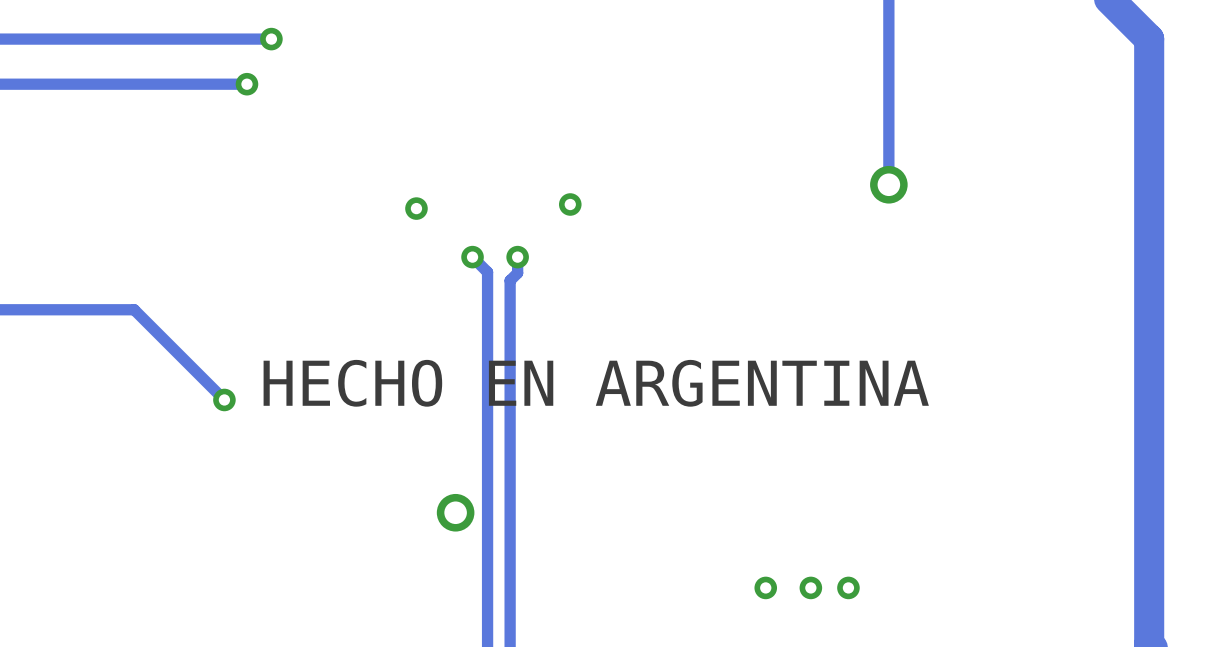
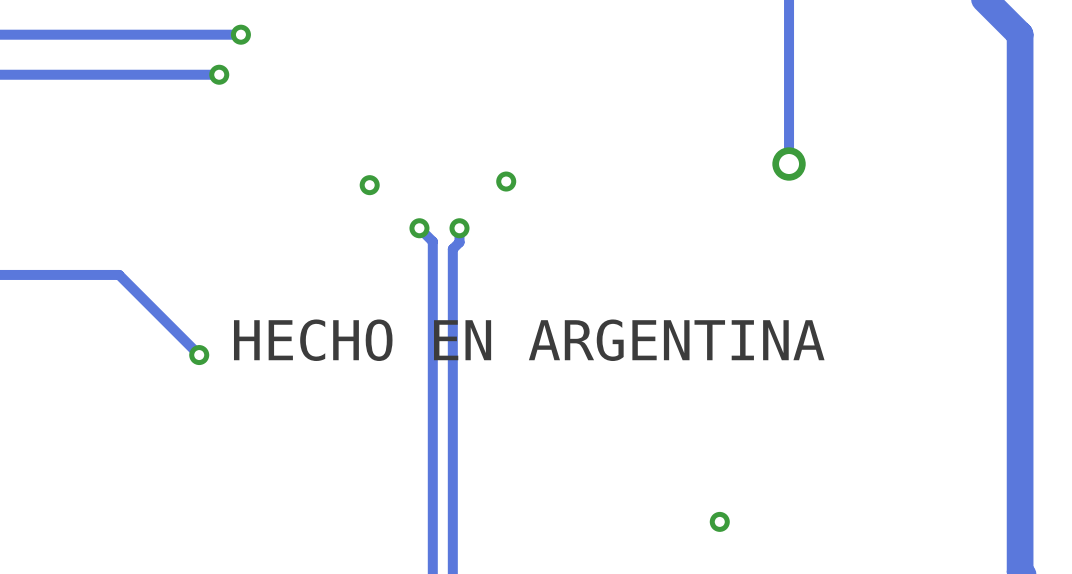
via: (455, 512) -> none
via: (765, 587) -> none
via: (848, 587) -> none

